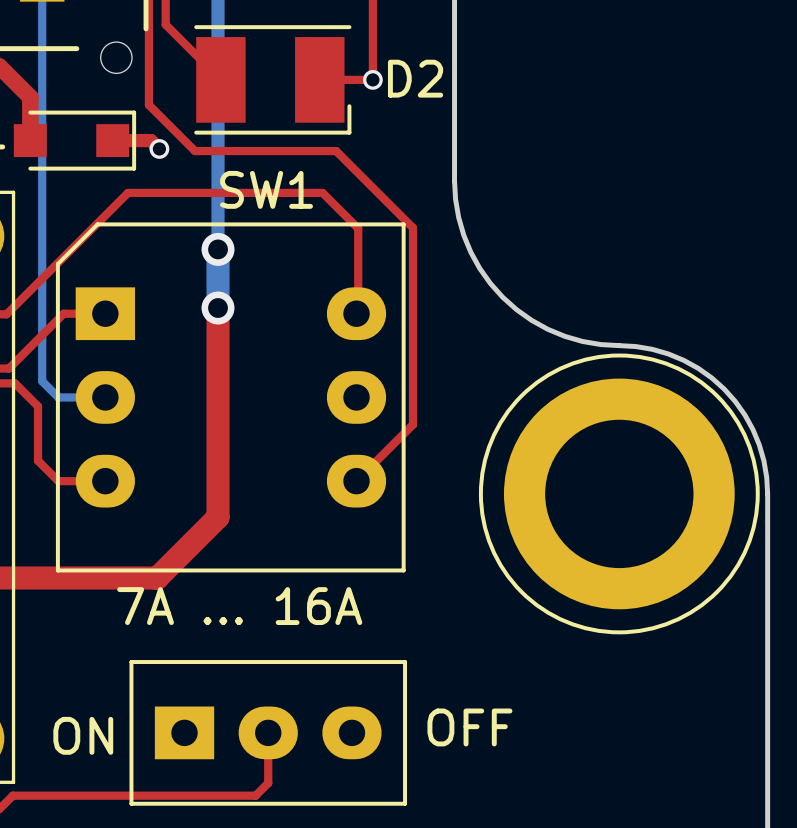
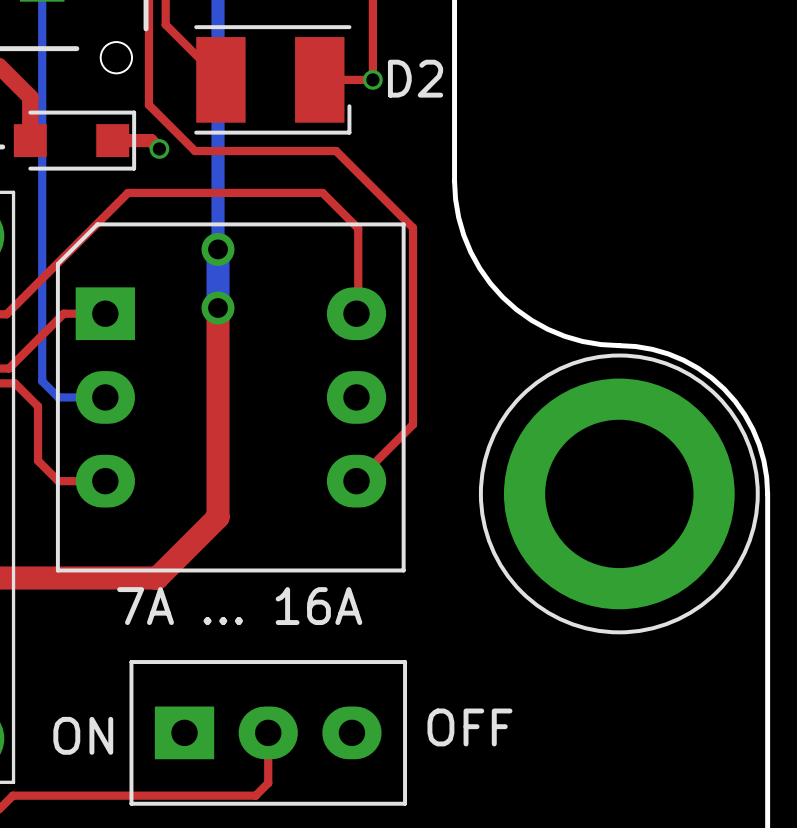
SW1 name: SW1 (266, 189) -> none

